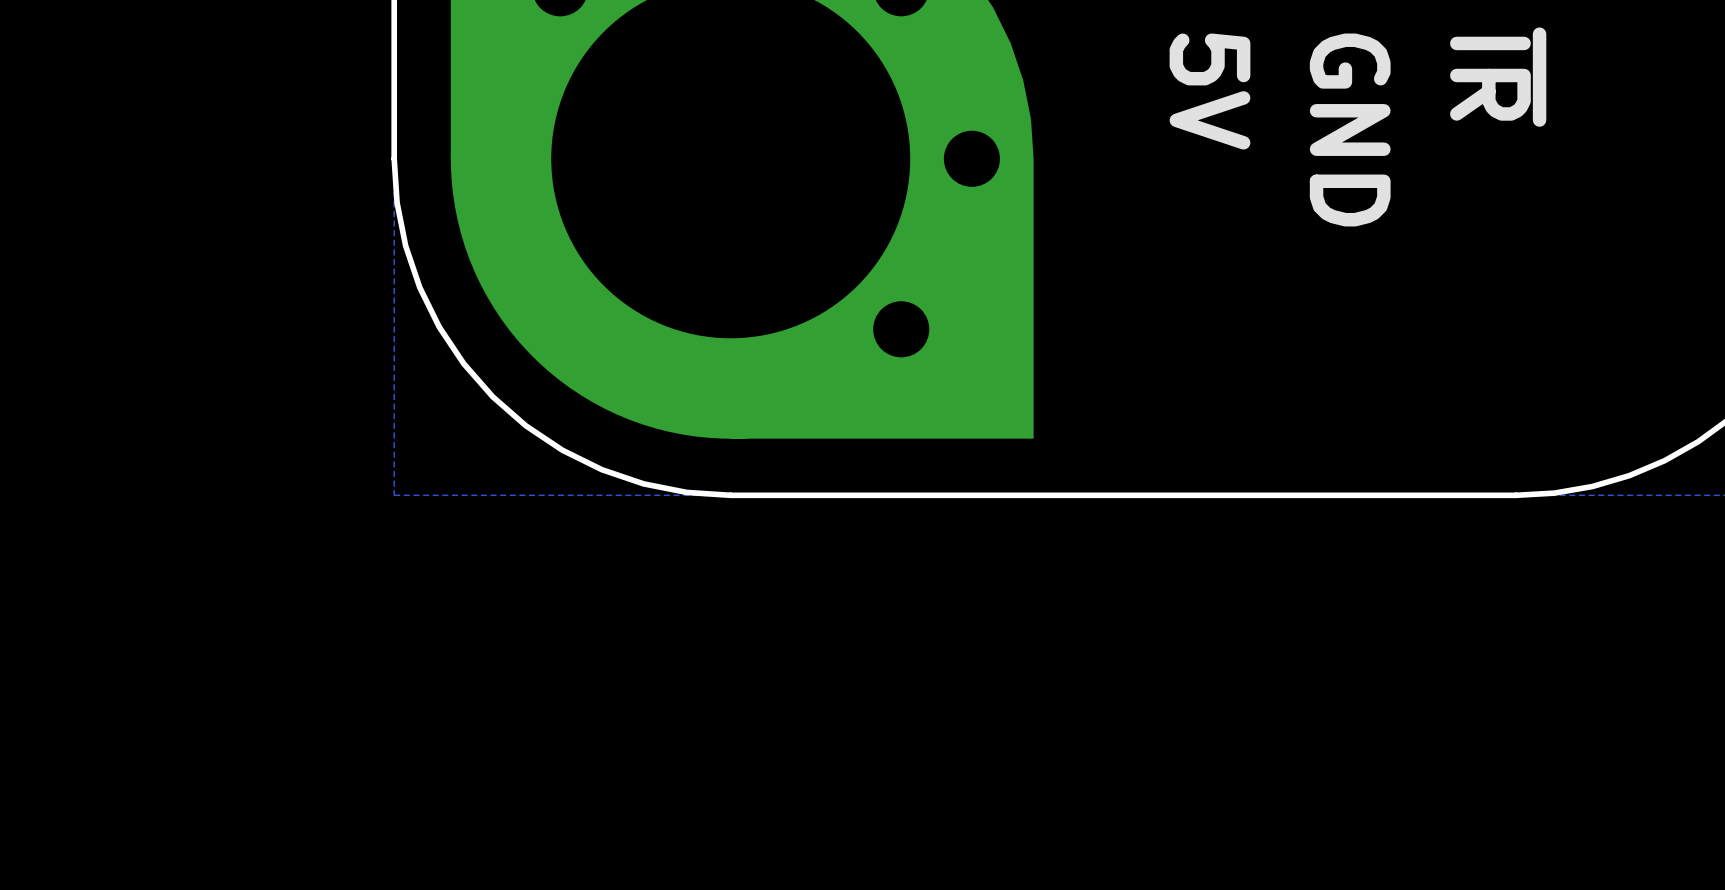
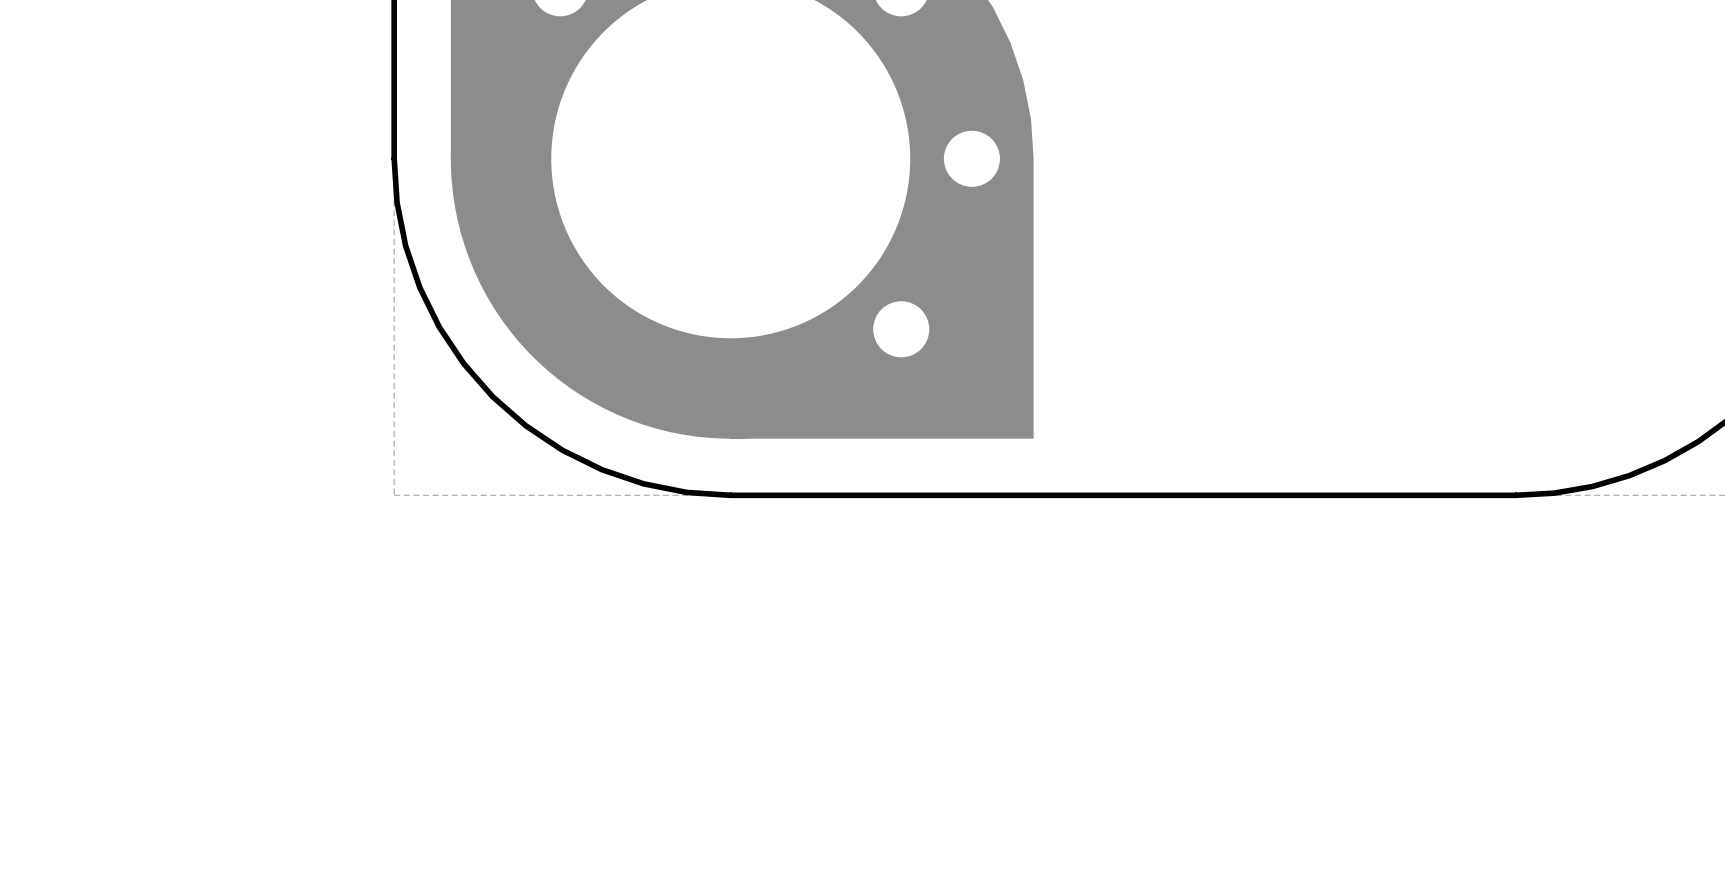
text: ~{IR} (1498, 77) -> none
text: 5V (1209, 91) -> none
text: GND (1350, 129) -> none

